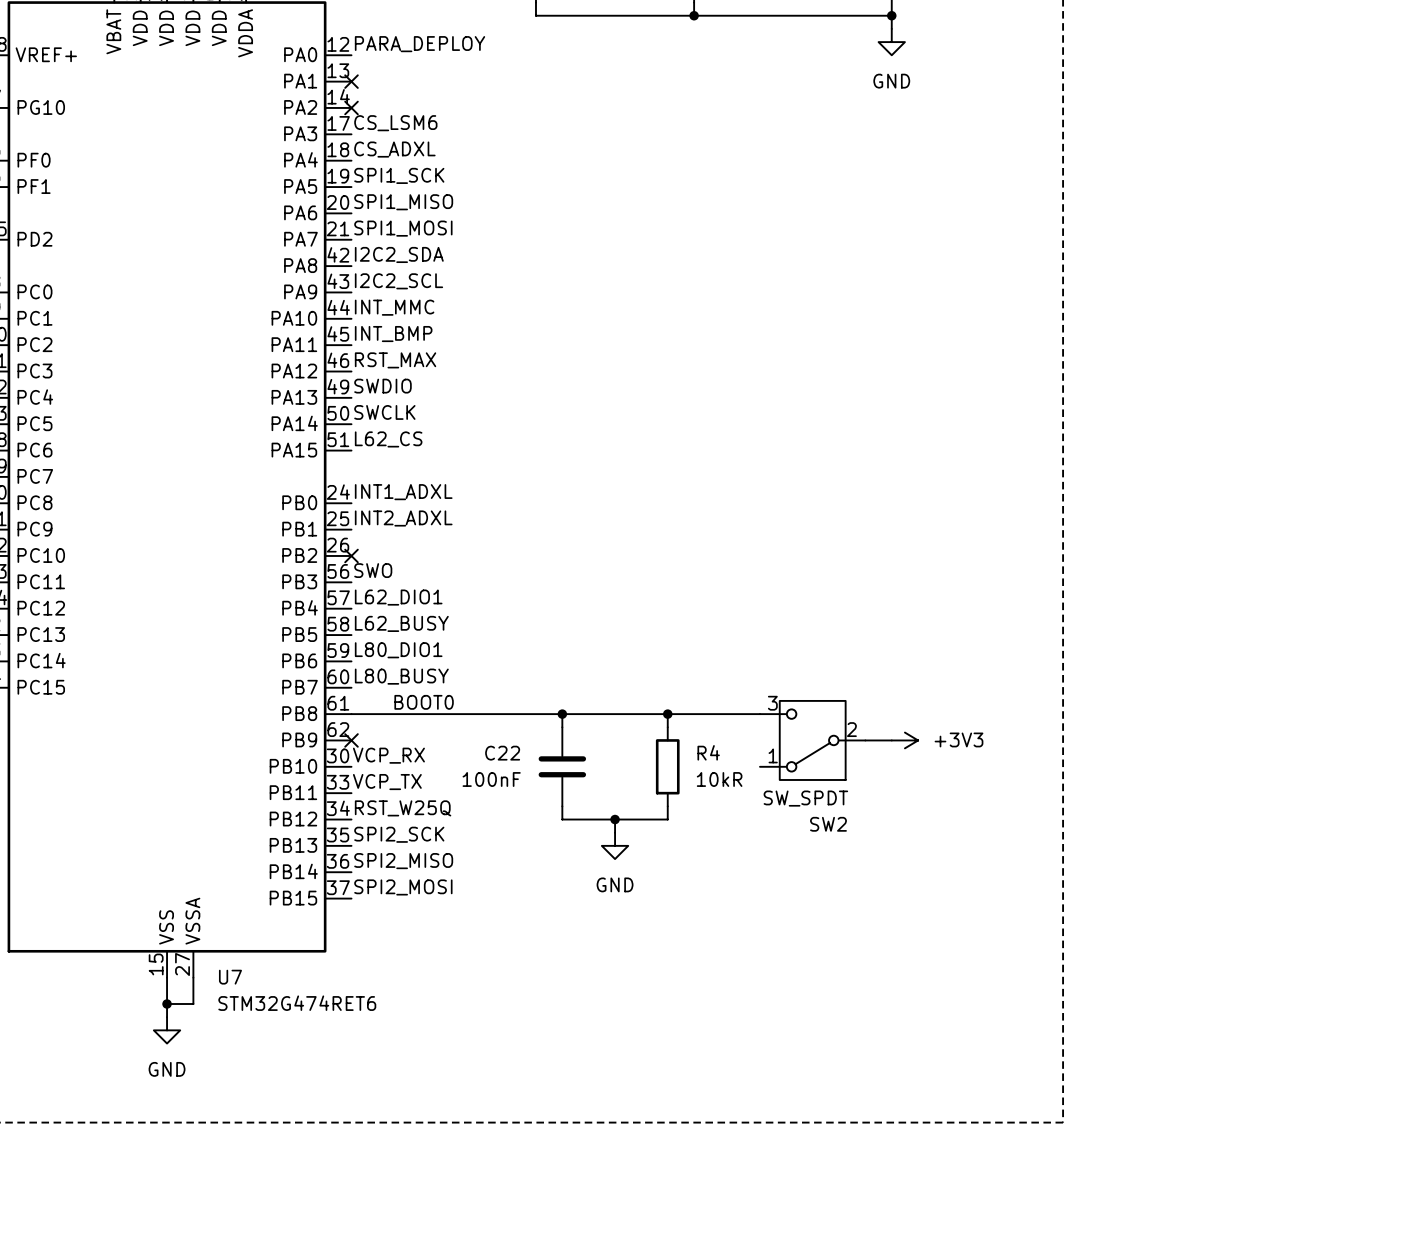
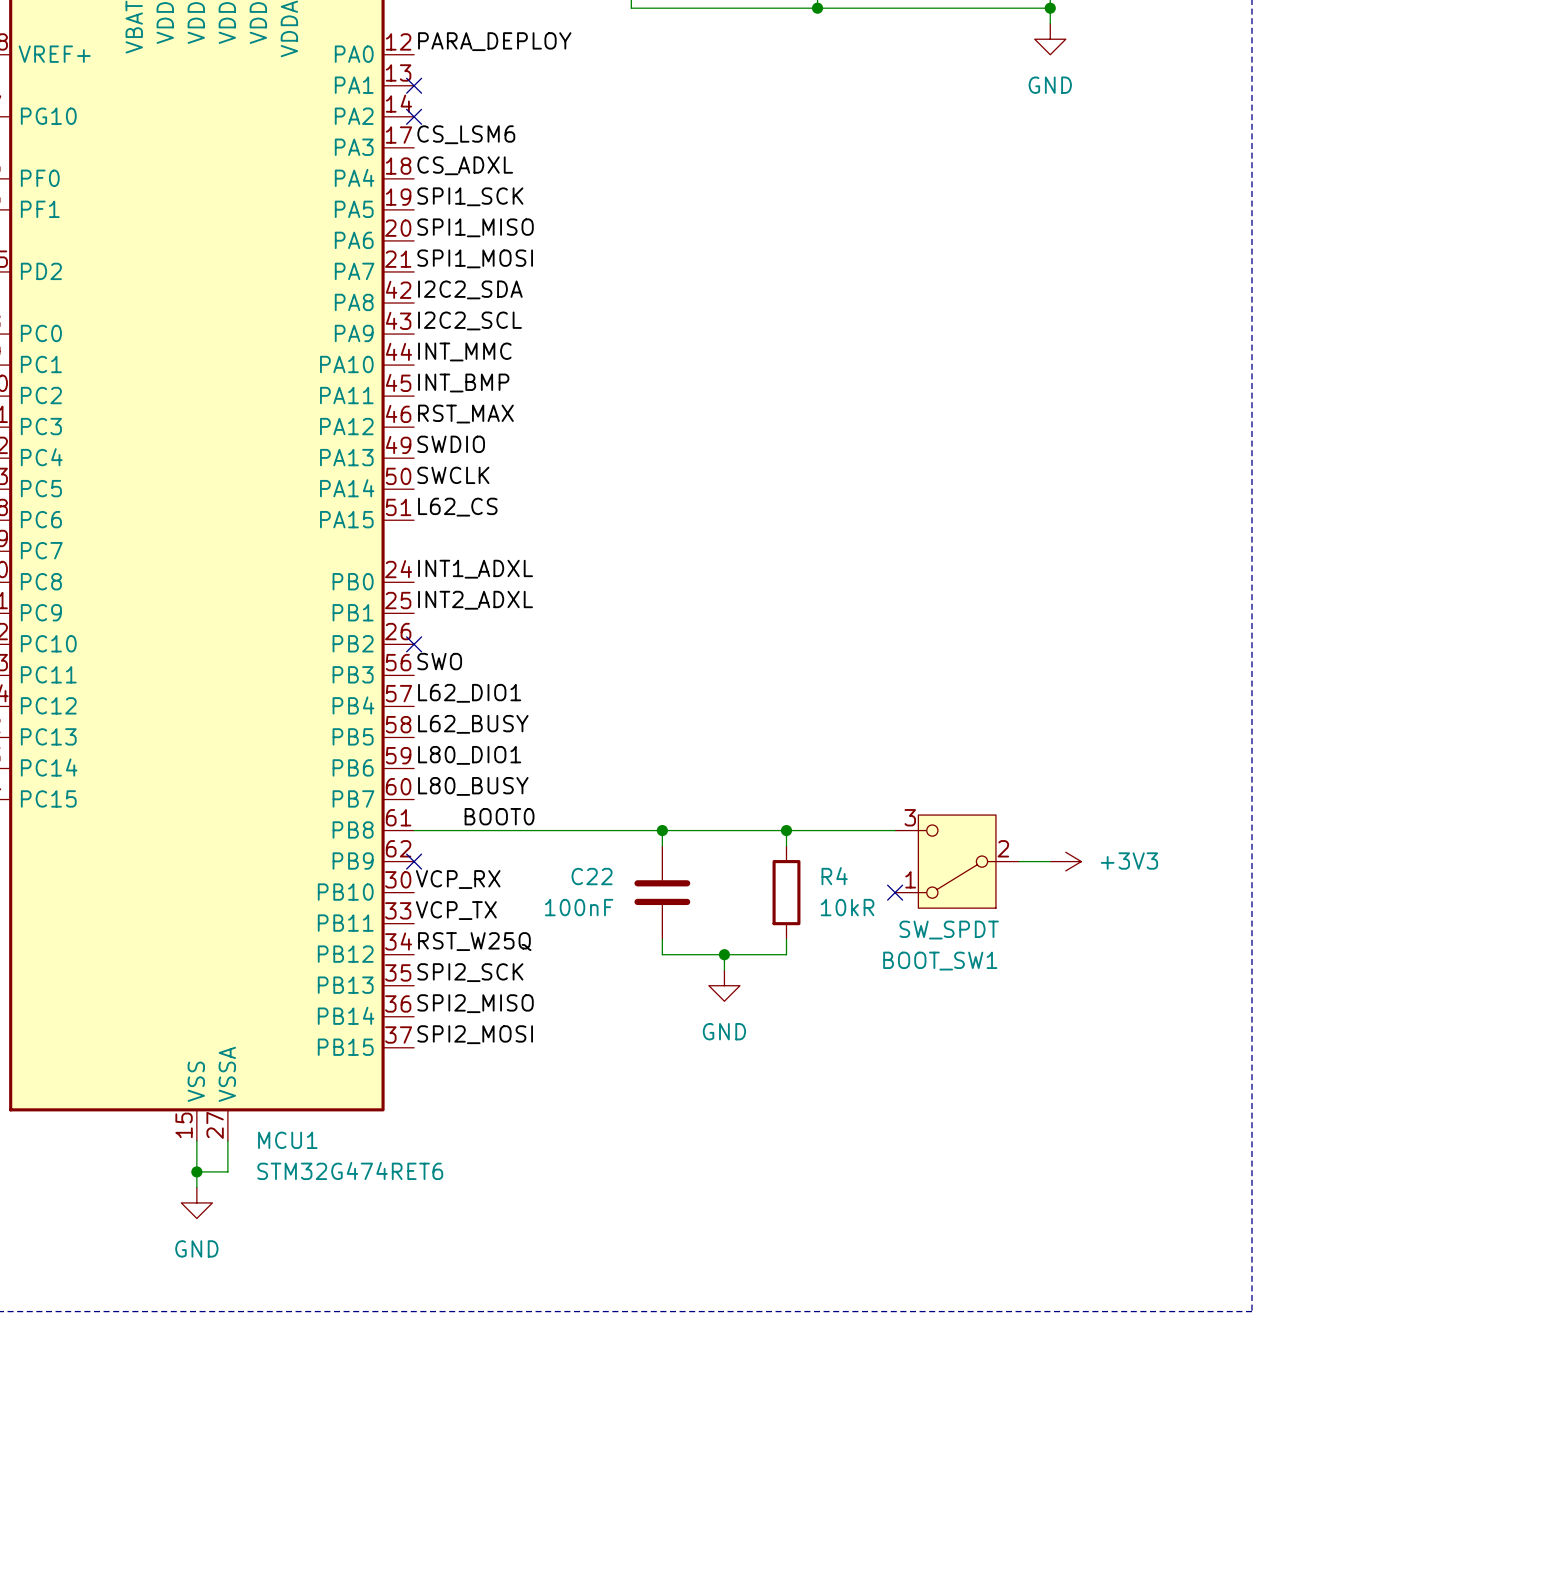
no-connect mark: none -> (895, 892)
SW2 name: SW2 (828, 824) -> BOOT_SW1 (940, 961)
U7 name: U7 (230, 977) -> MCU1 (287, 1140)

